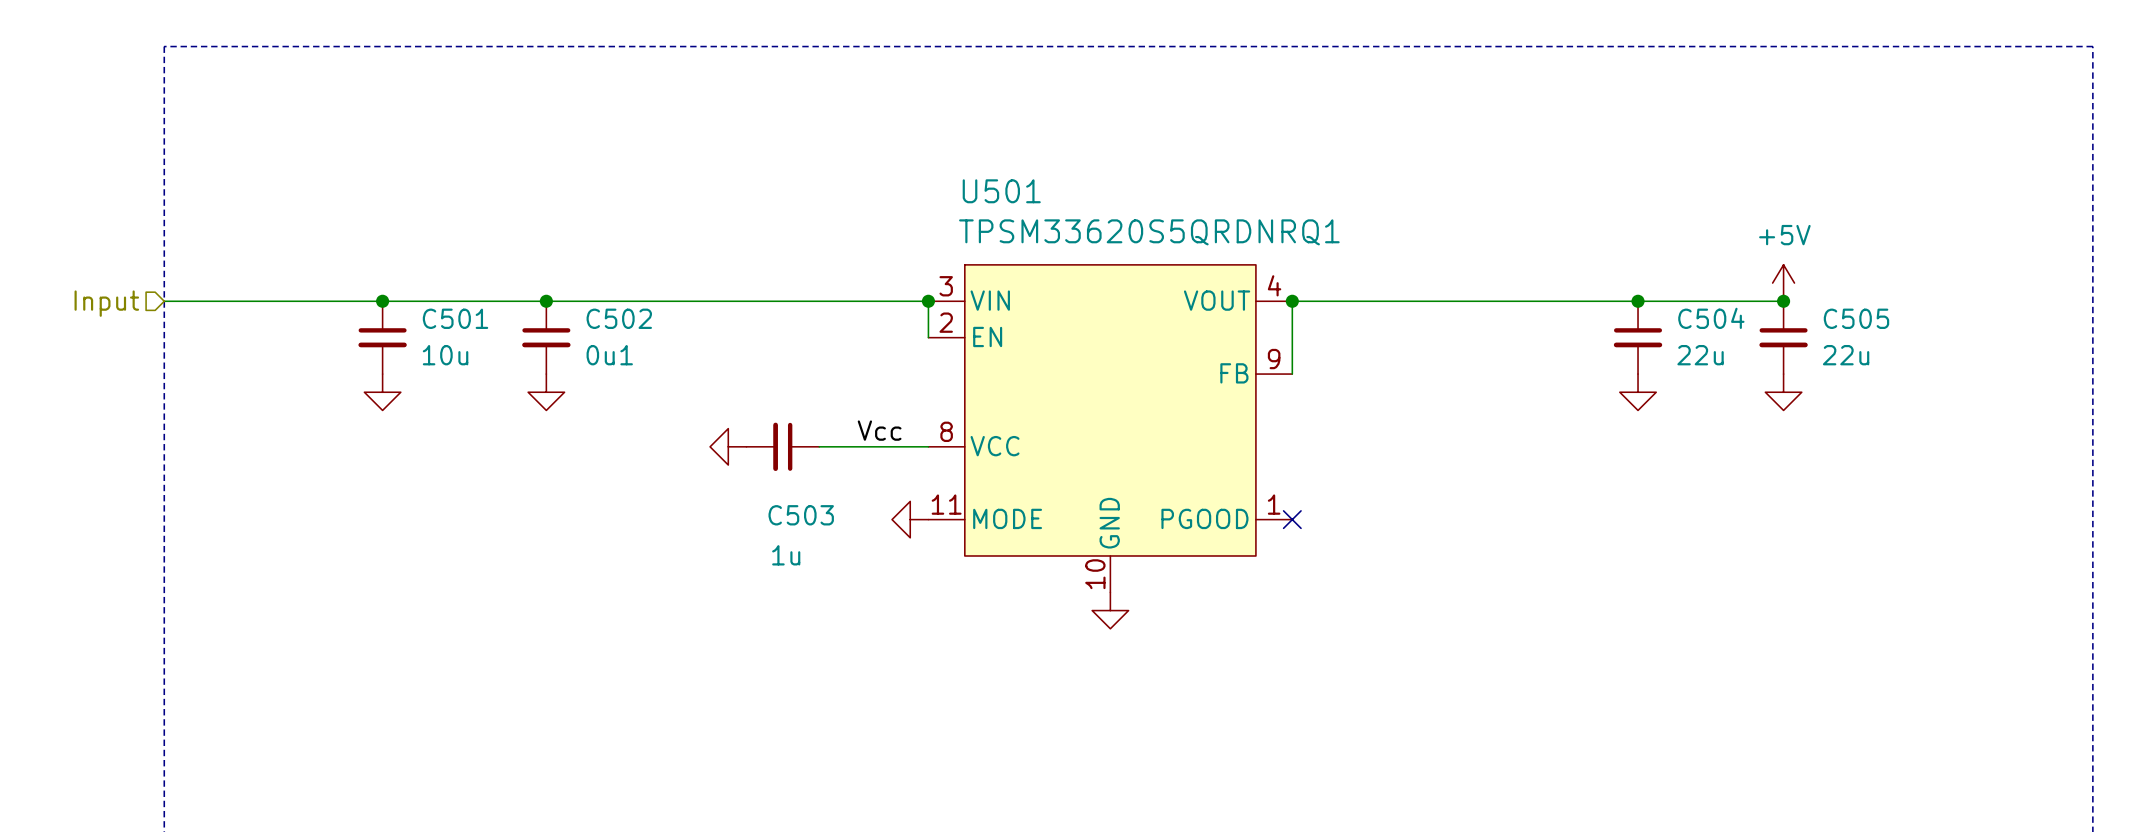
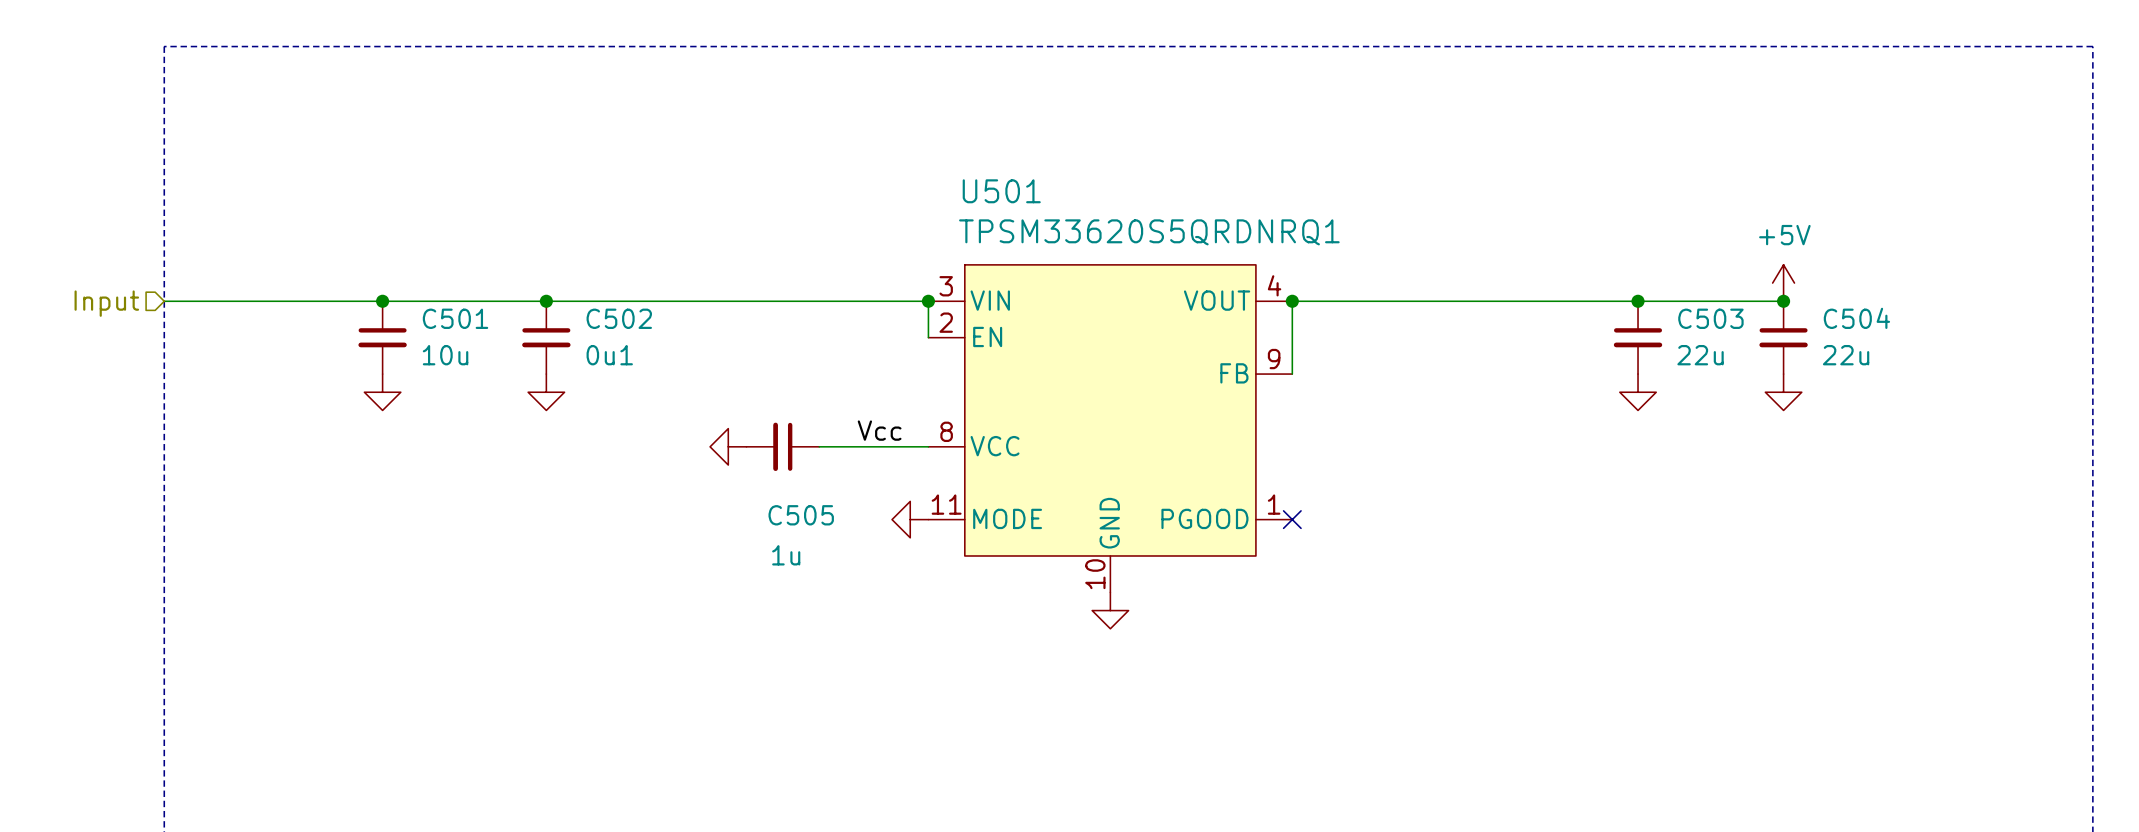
C504 name: C504 (1711, 318) -> C503 (1710, 318)
C505 name: C505 (1856, 318) -> C504 (1856, 318)
C503 name: C503 (801, 515) -> C505 (801, 515)

